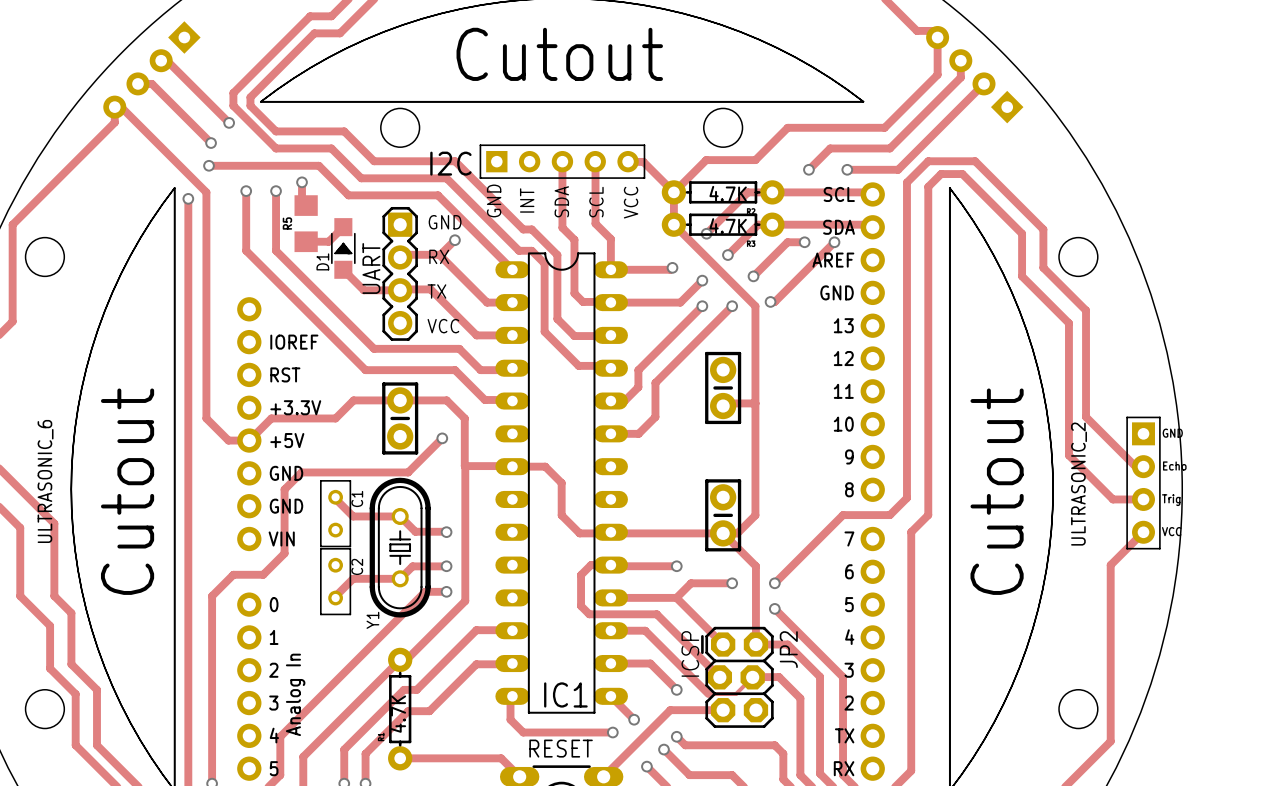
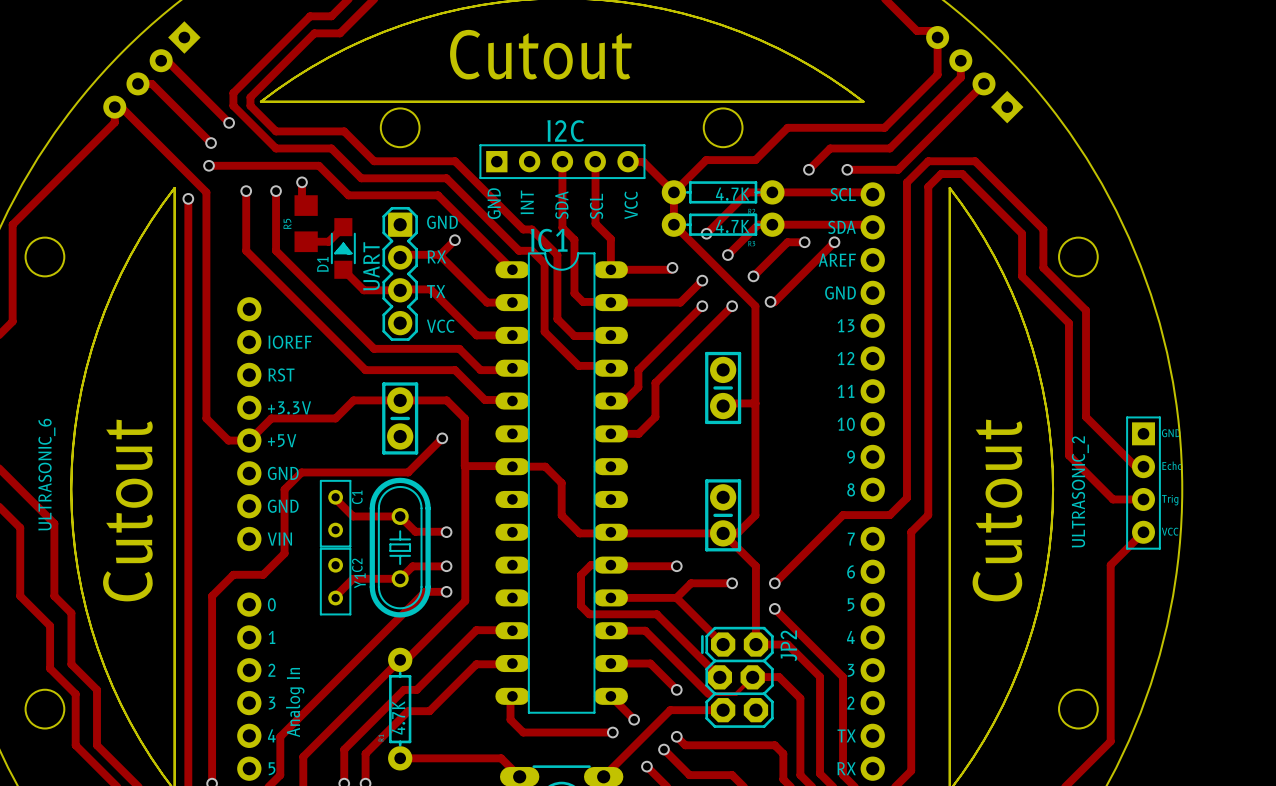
I2C name position: I2C (450, 163) -> I2C (565, 131)
Y1 name position: Y1 (372, 620) -> Y1 (359, 580)
JP2 value: ICSP (690, 653) -> none
IC1 name position: IC1 (565, 694) -> IC1 (549, 240)
part value: RESET (561, 748) -> none

